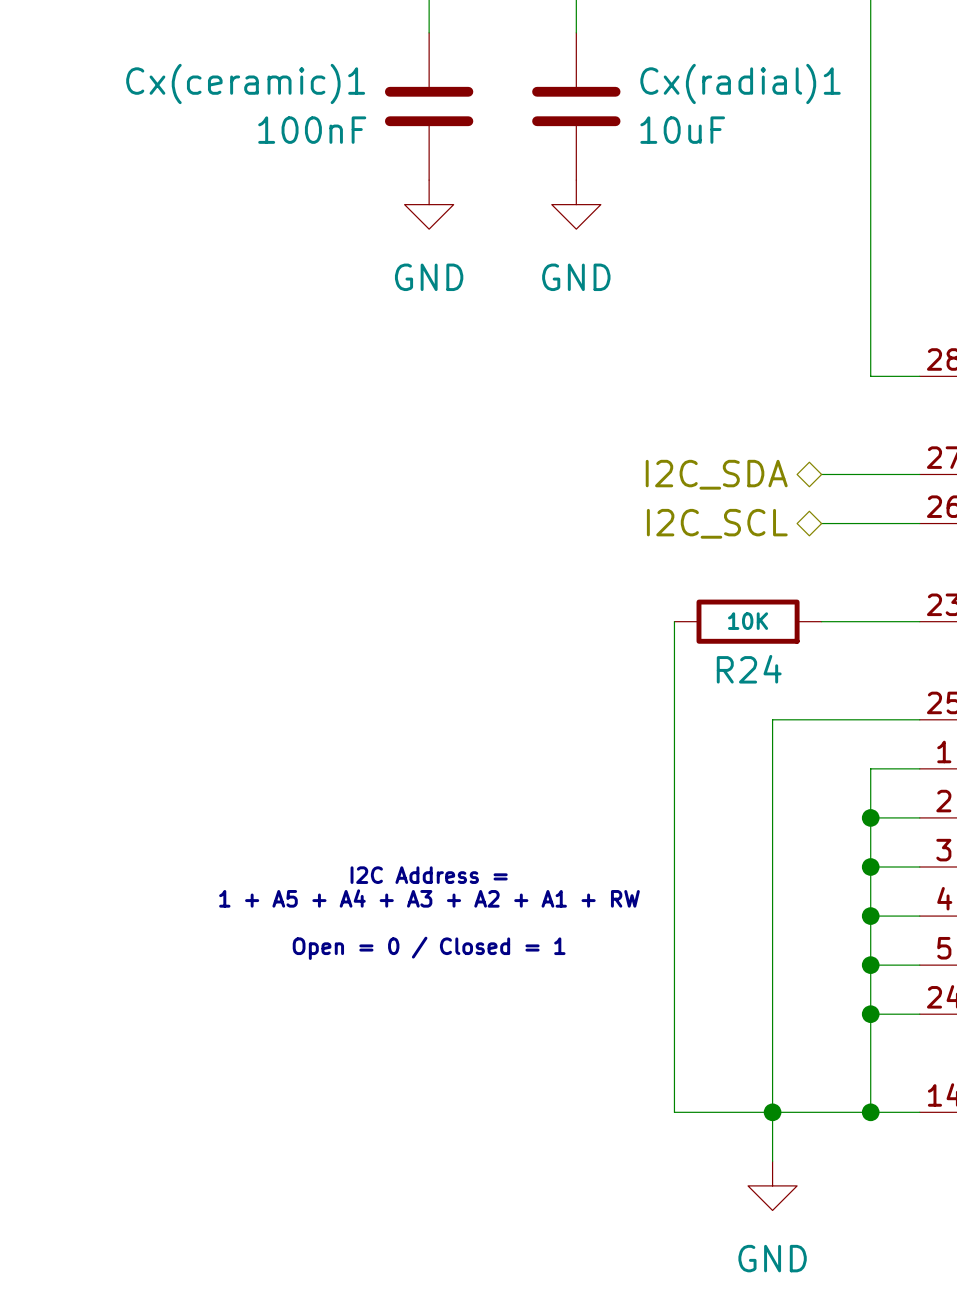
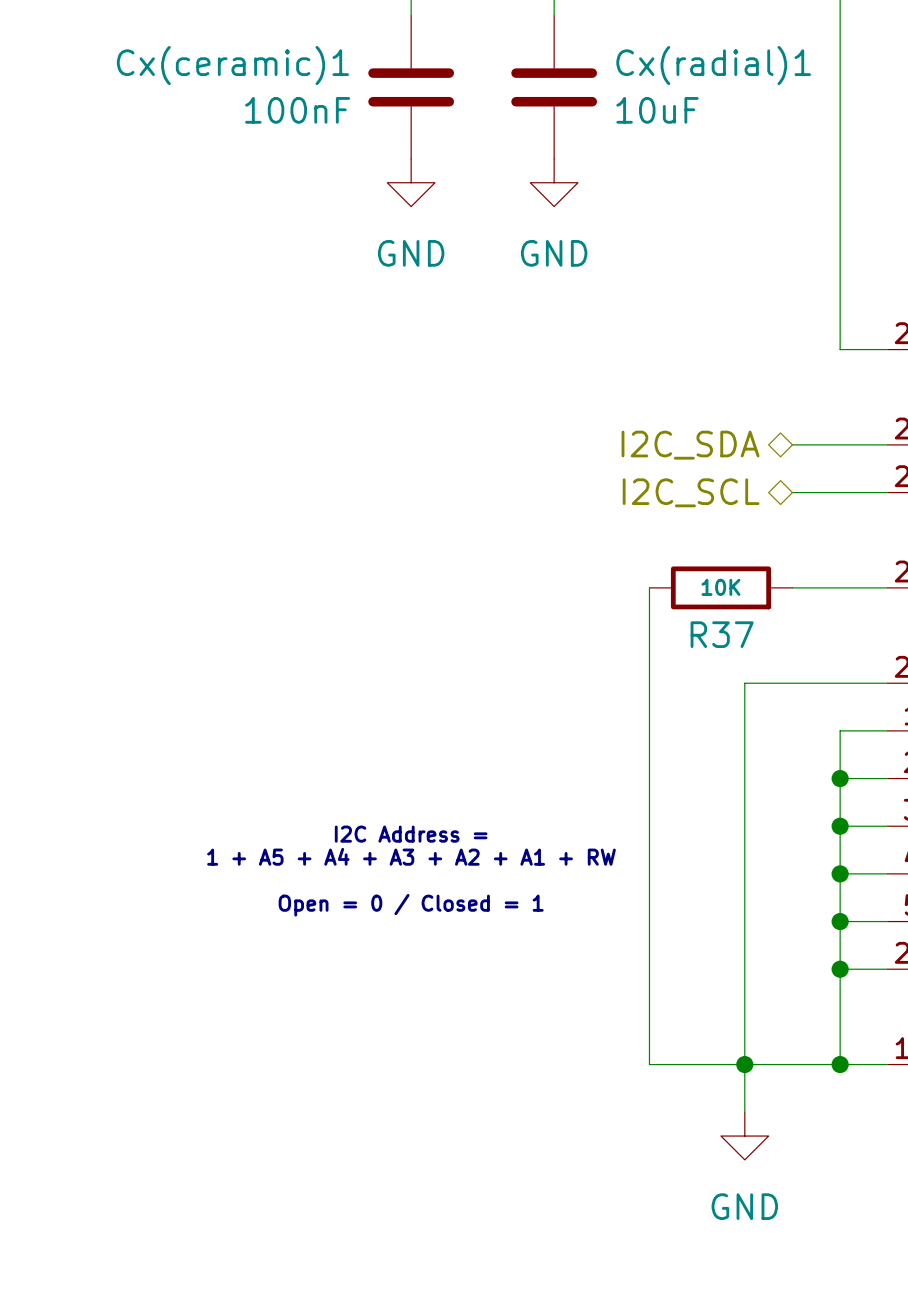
R24 name: R24 (749, 669) -> R37 (722, 634)

